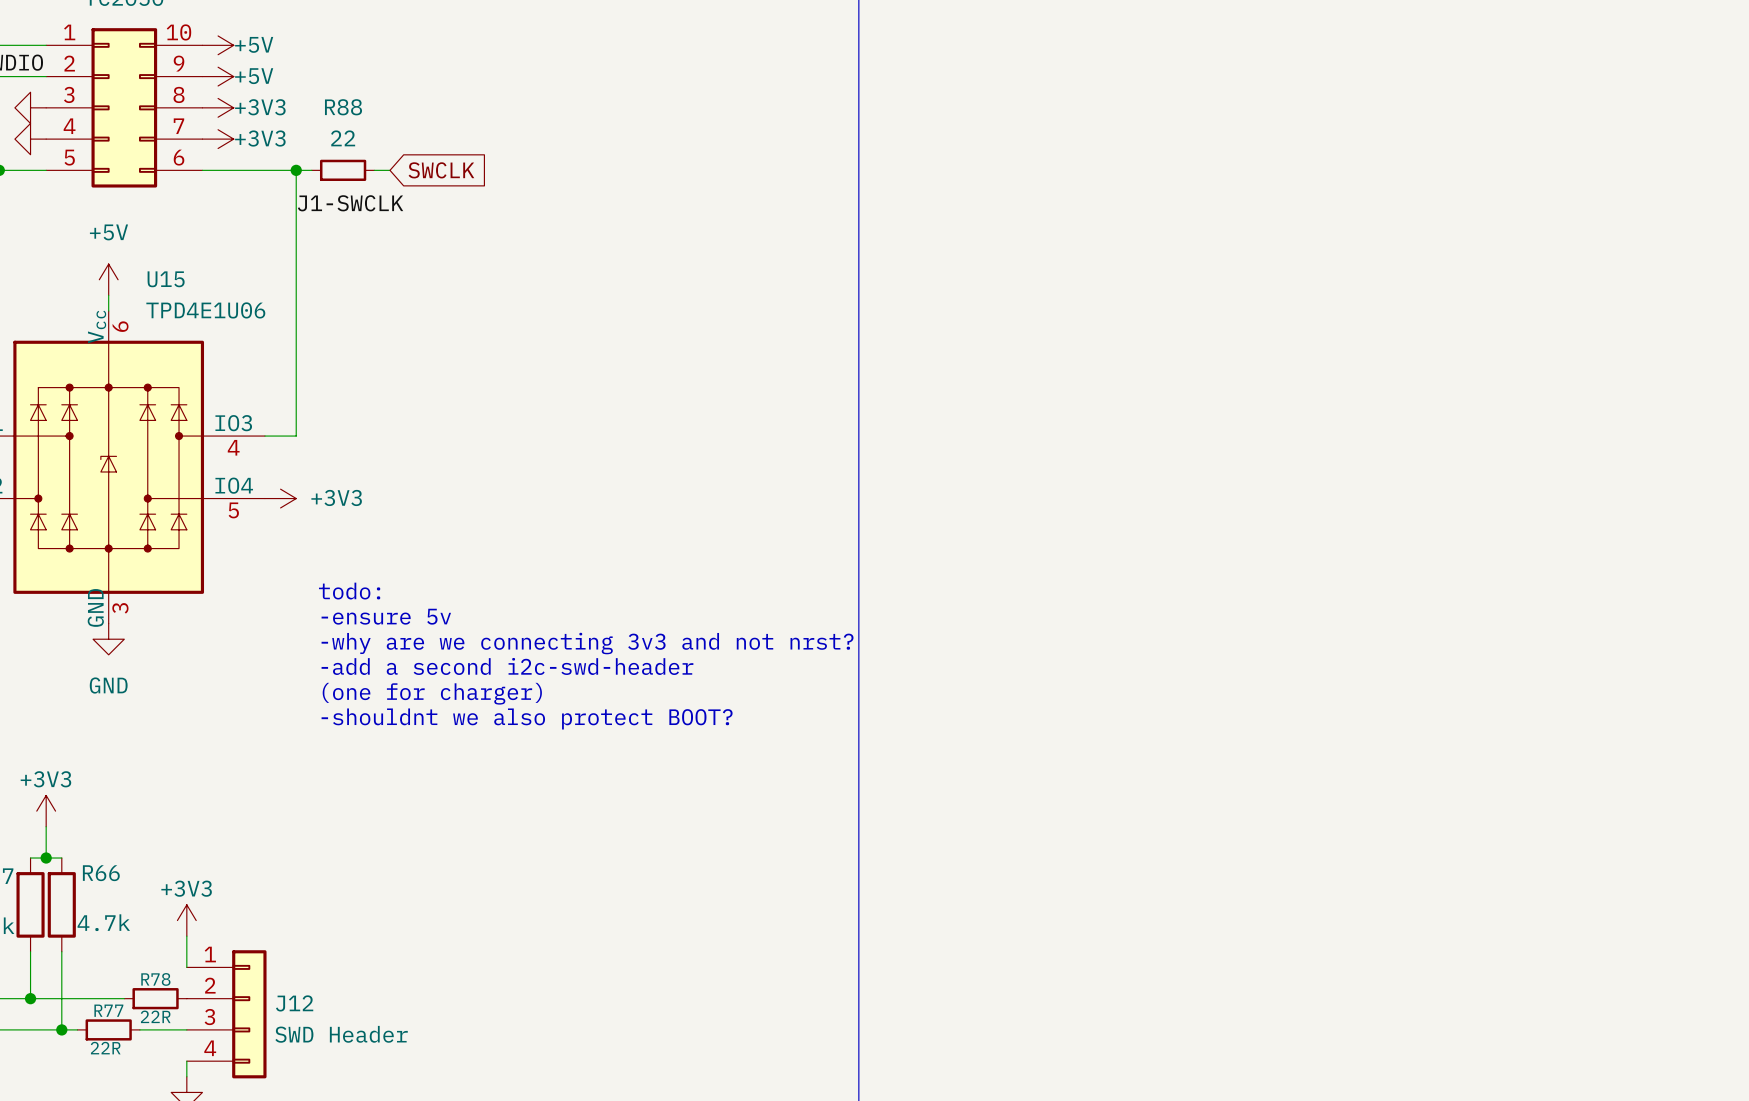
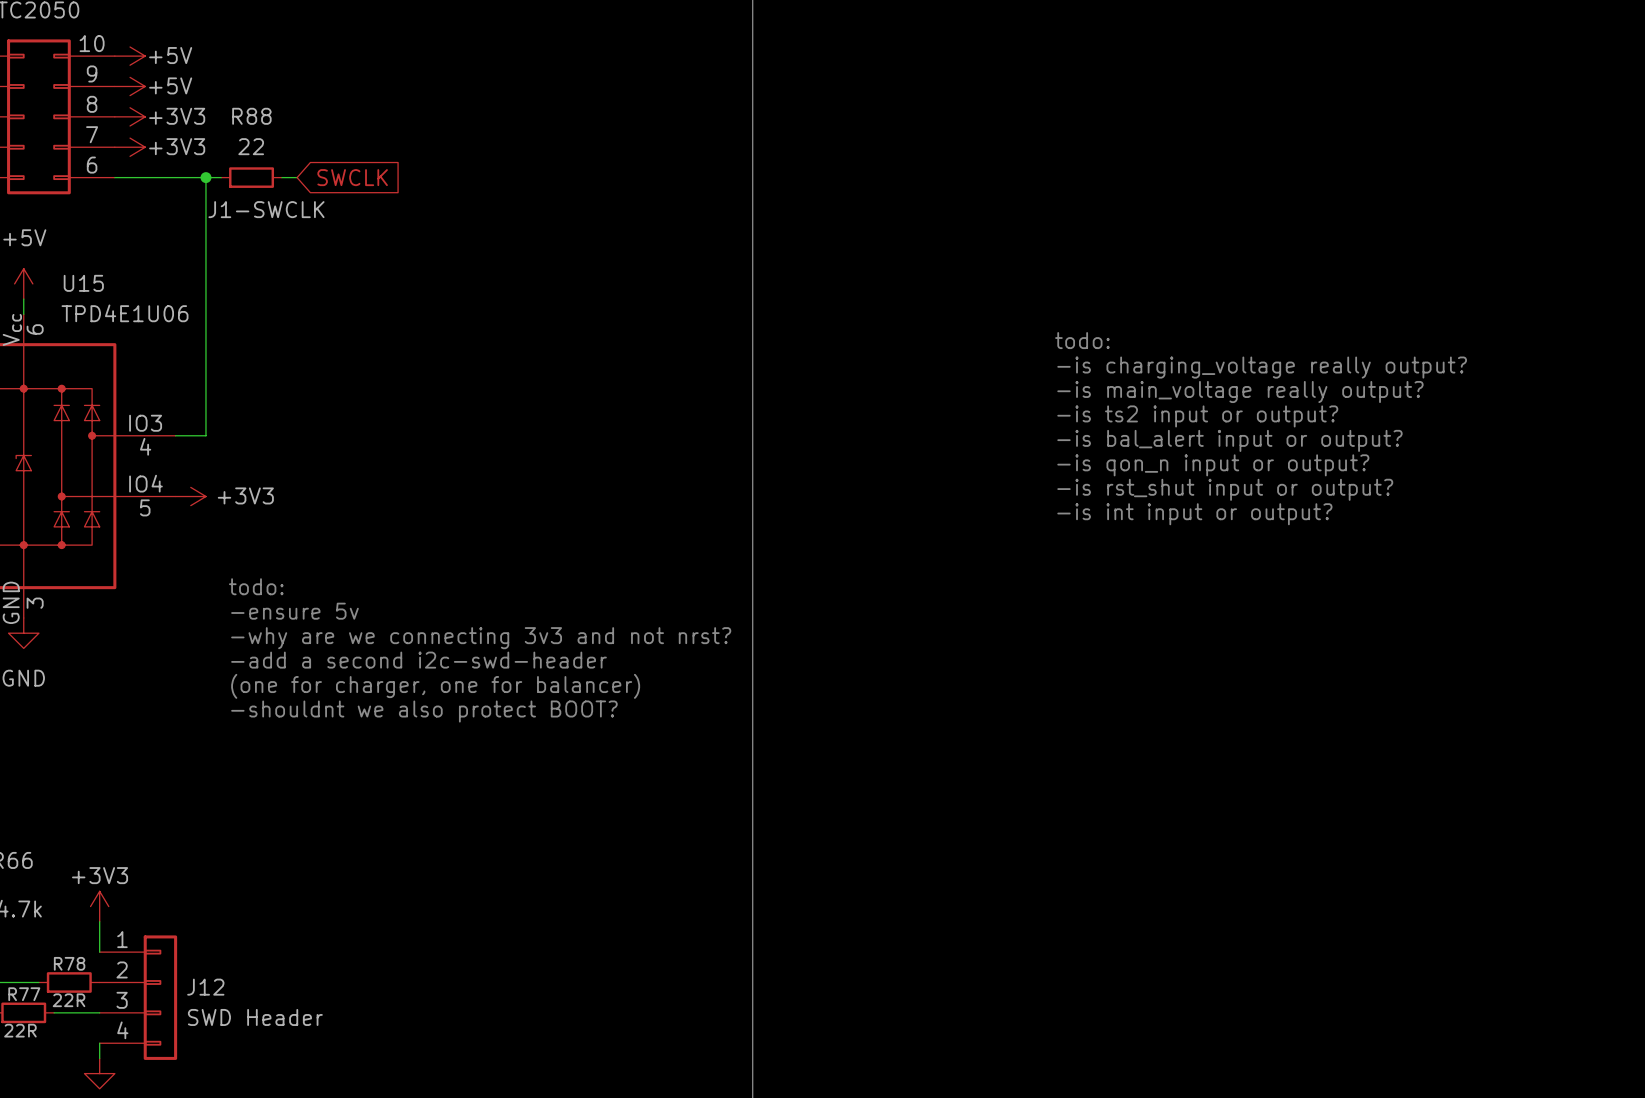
text: none -> todo: (1082, 340)
text: none -> -is charging_voltage really output? (1262, 367)
text: none -> -is main_voltage really output? (1240, 392)
text: none -> -is ts2 input or output? (1197, 416)
text: none -> -is bal_alert input or output? (1229, 440)
text: none -> -is qon_n input or output? (1213, 465)
text: none -> -is rst_shut input or output? (1225, 489)
text: none -> -is int input or output? (1194, 514)
text: (one for charger) (432, 693) -> (one for charger, one for balancer) (435, 686)

